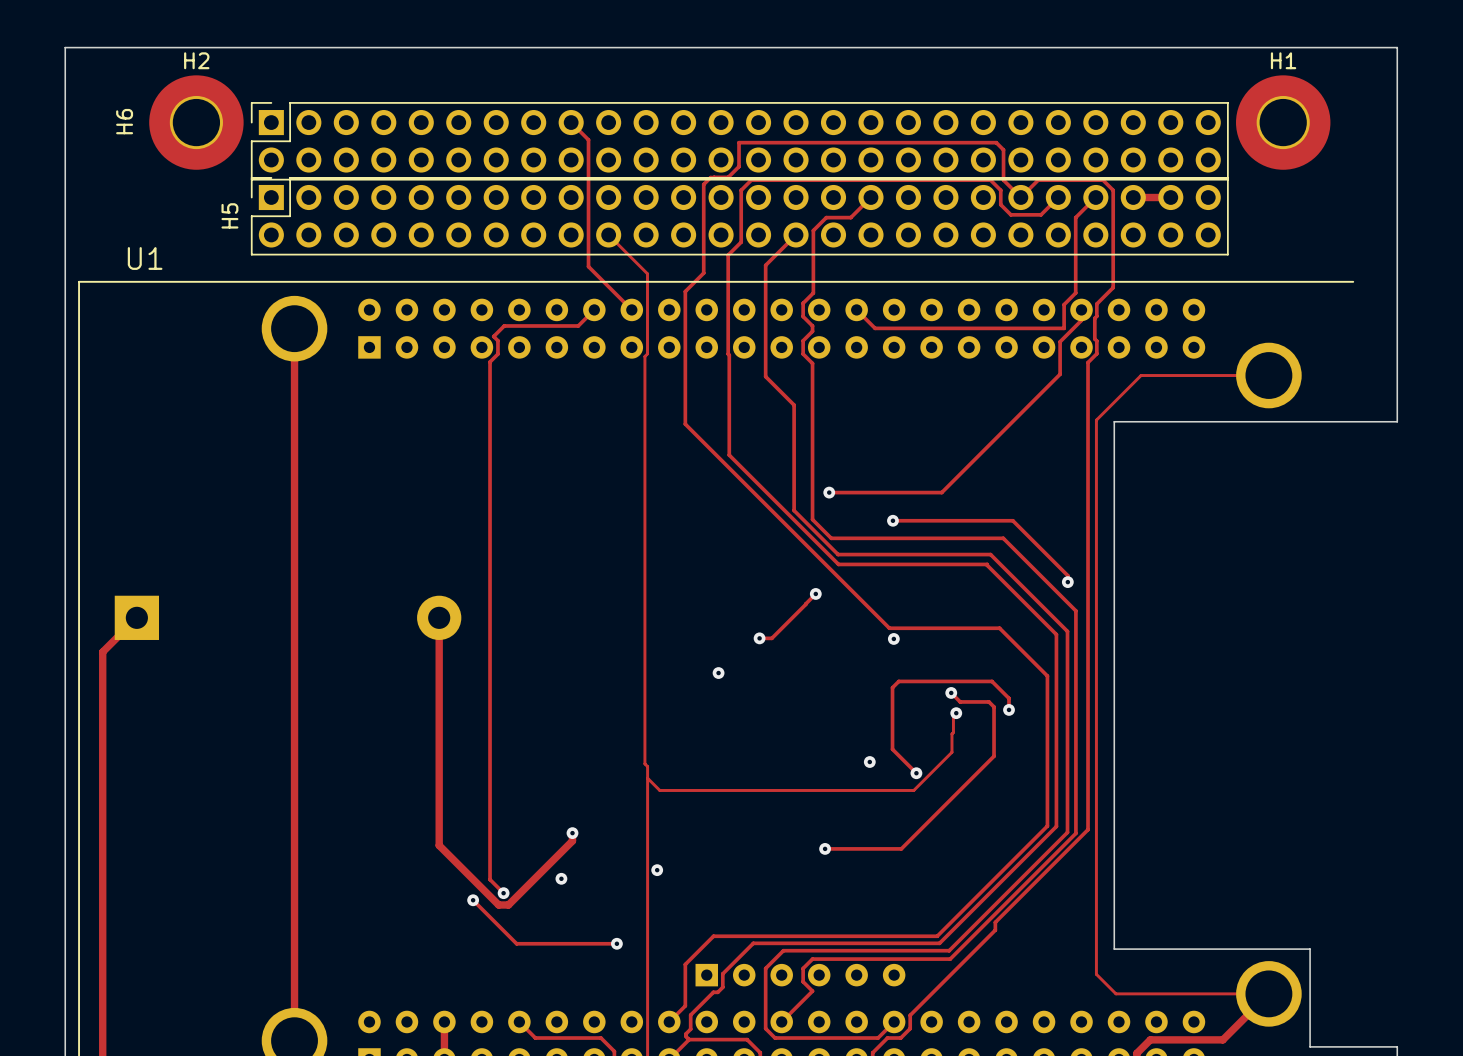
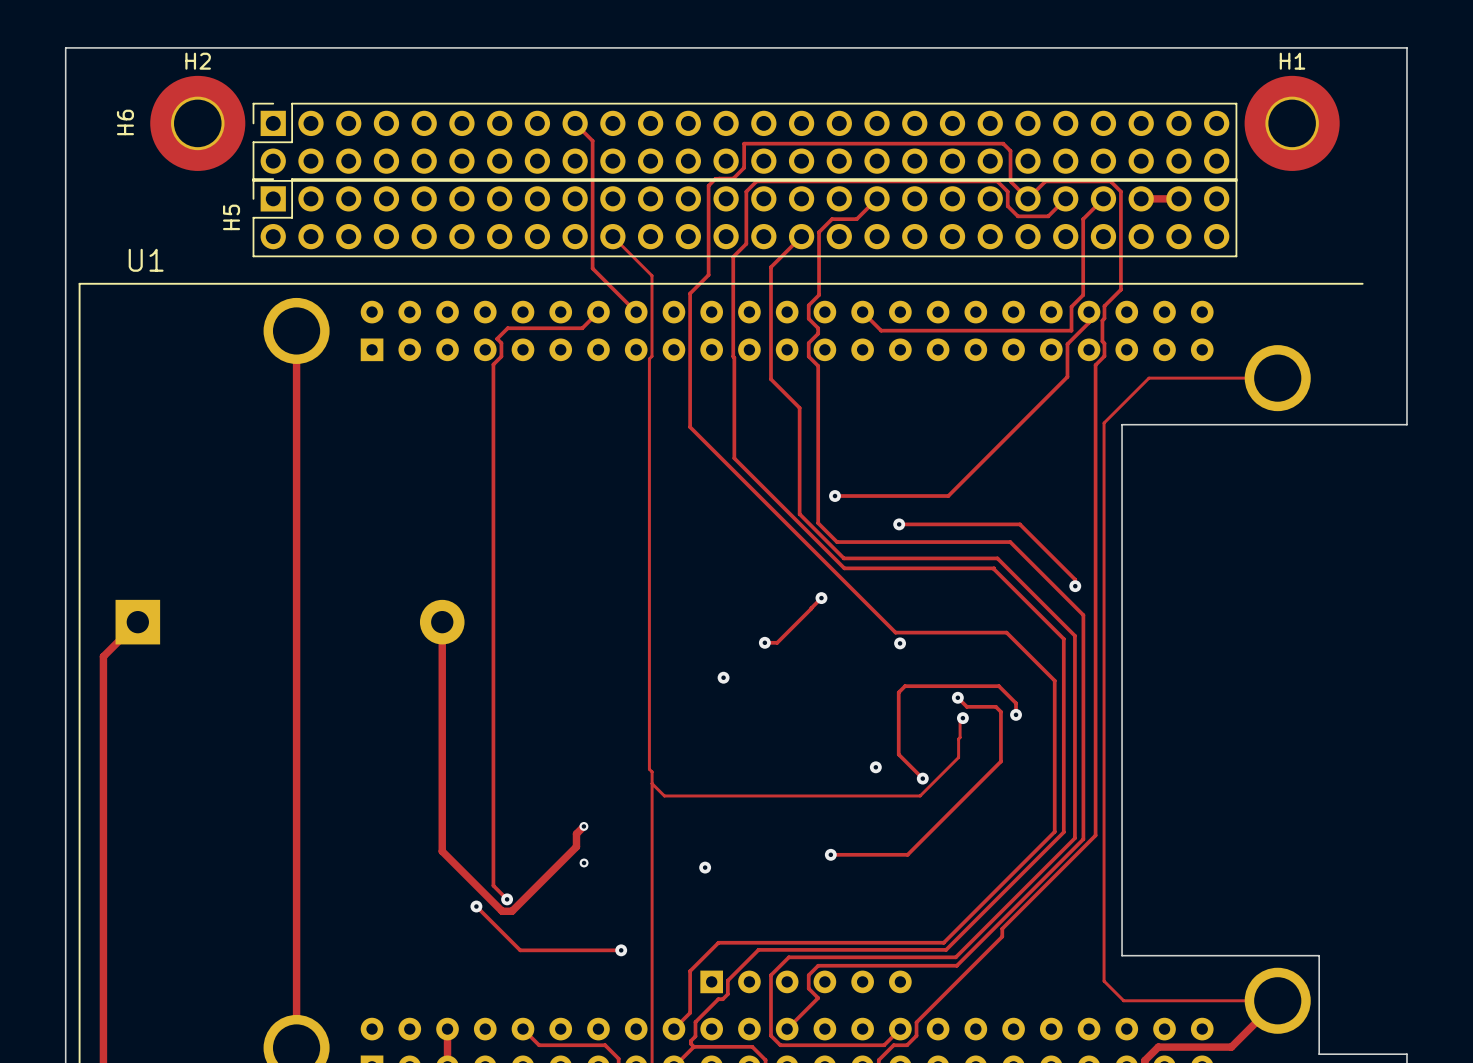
track: none -> (583, 826) (576, 833) (576, 838)
via: none -> (583, 826)
via: (572, 833) -> none
via: none -> (584, 862)
via position: (657, 870) -> (705, 867)
via: (561, 878) -> none

